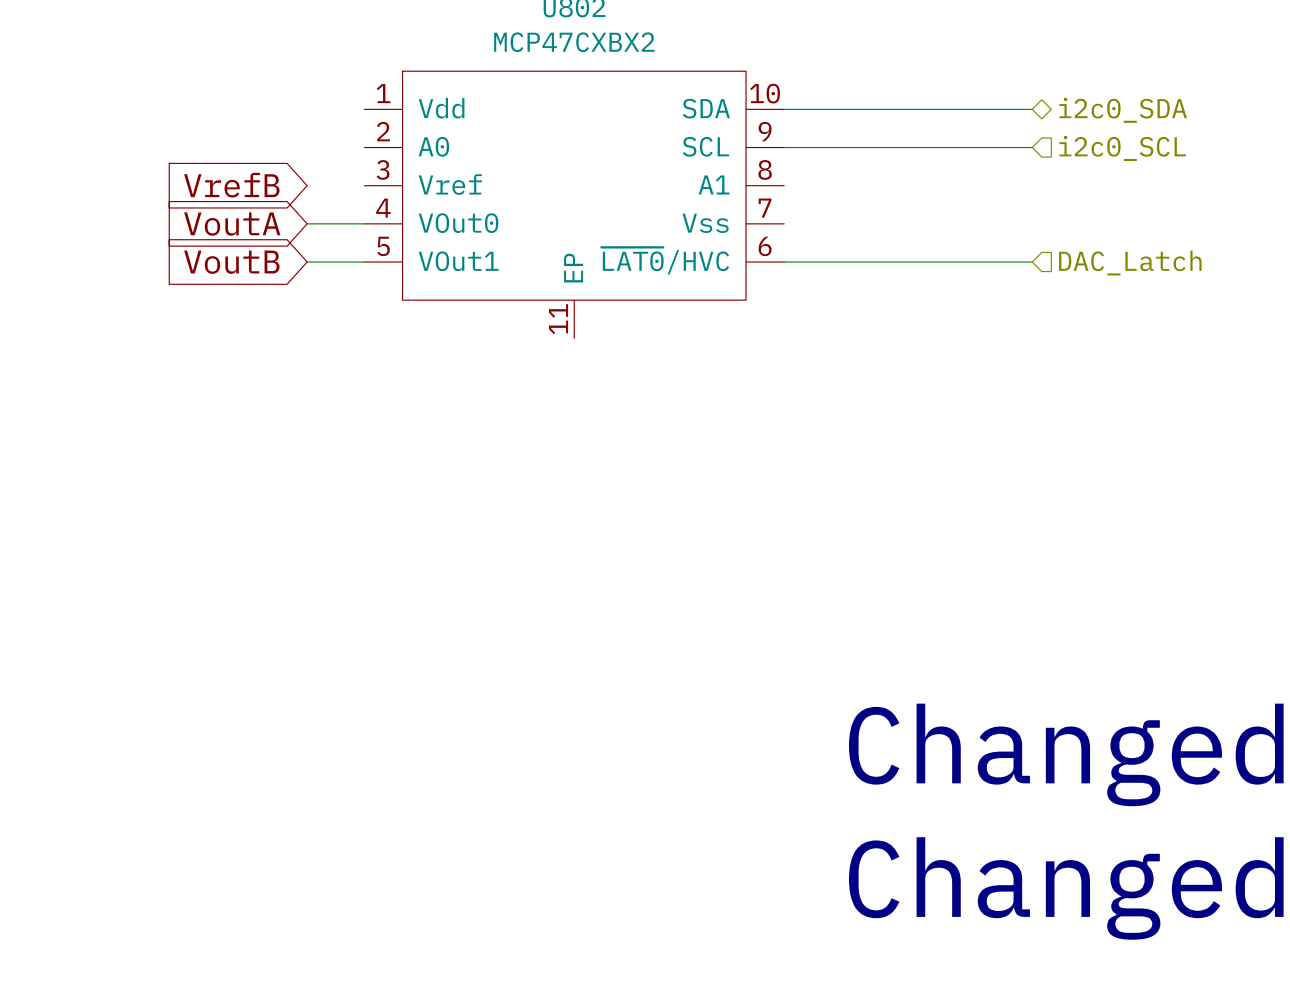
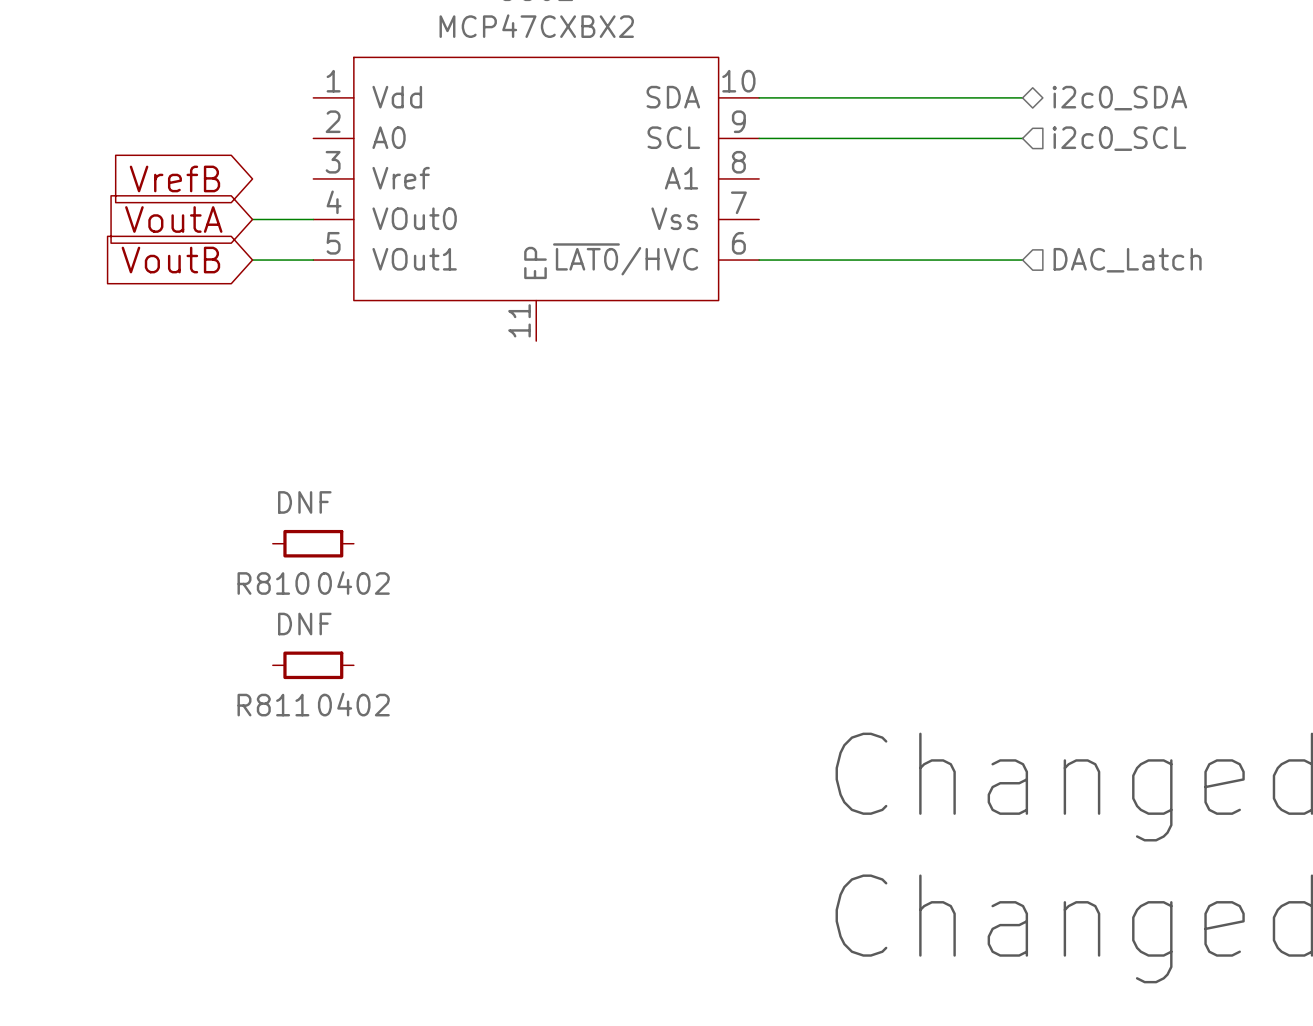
R810: none -> DNF (313, 543)
R811: none -> DNF (313, 665)

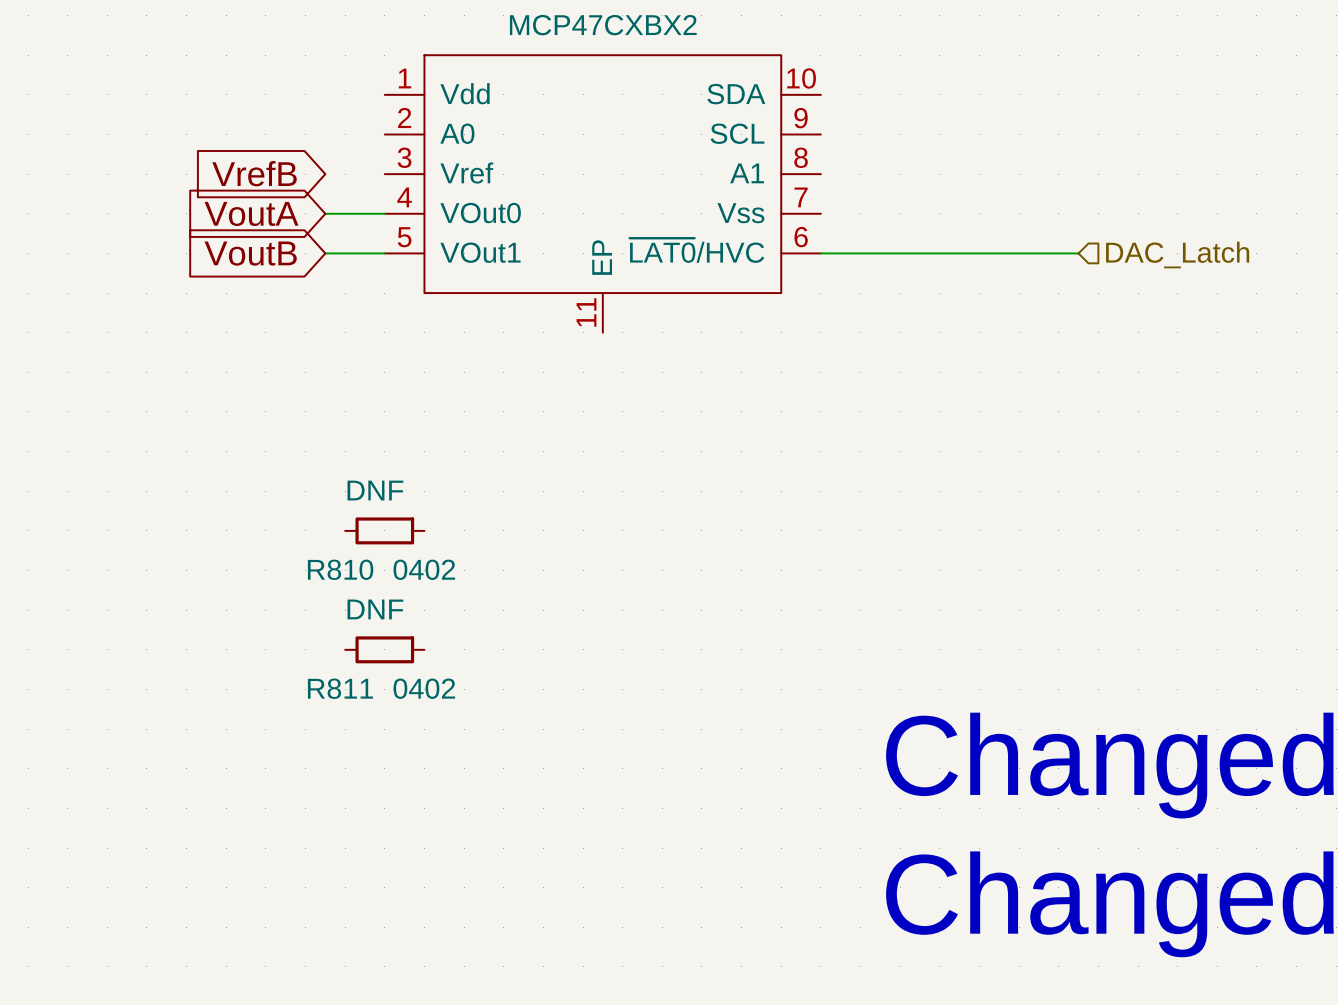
wire: (759, 97) (1022, 97) -> none
hierarchical label: i2c0_SDA (1119, 98) -> none
wire: (759, 138) (1022, 138) -> none
hierarchical label: i2c0_SCL (1119, 138) -> none

